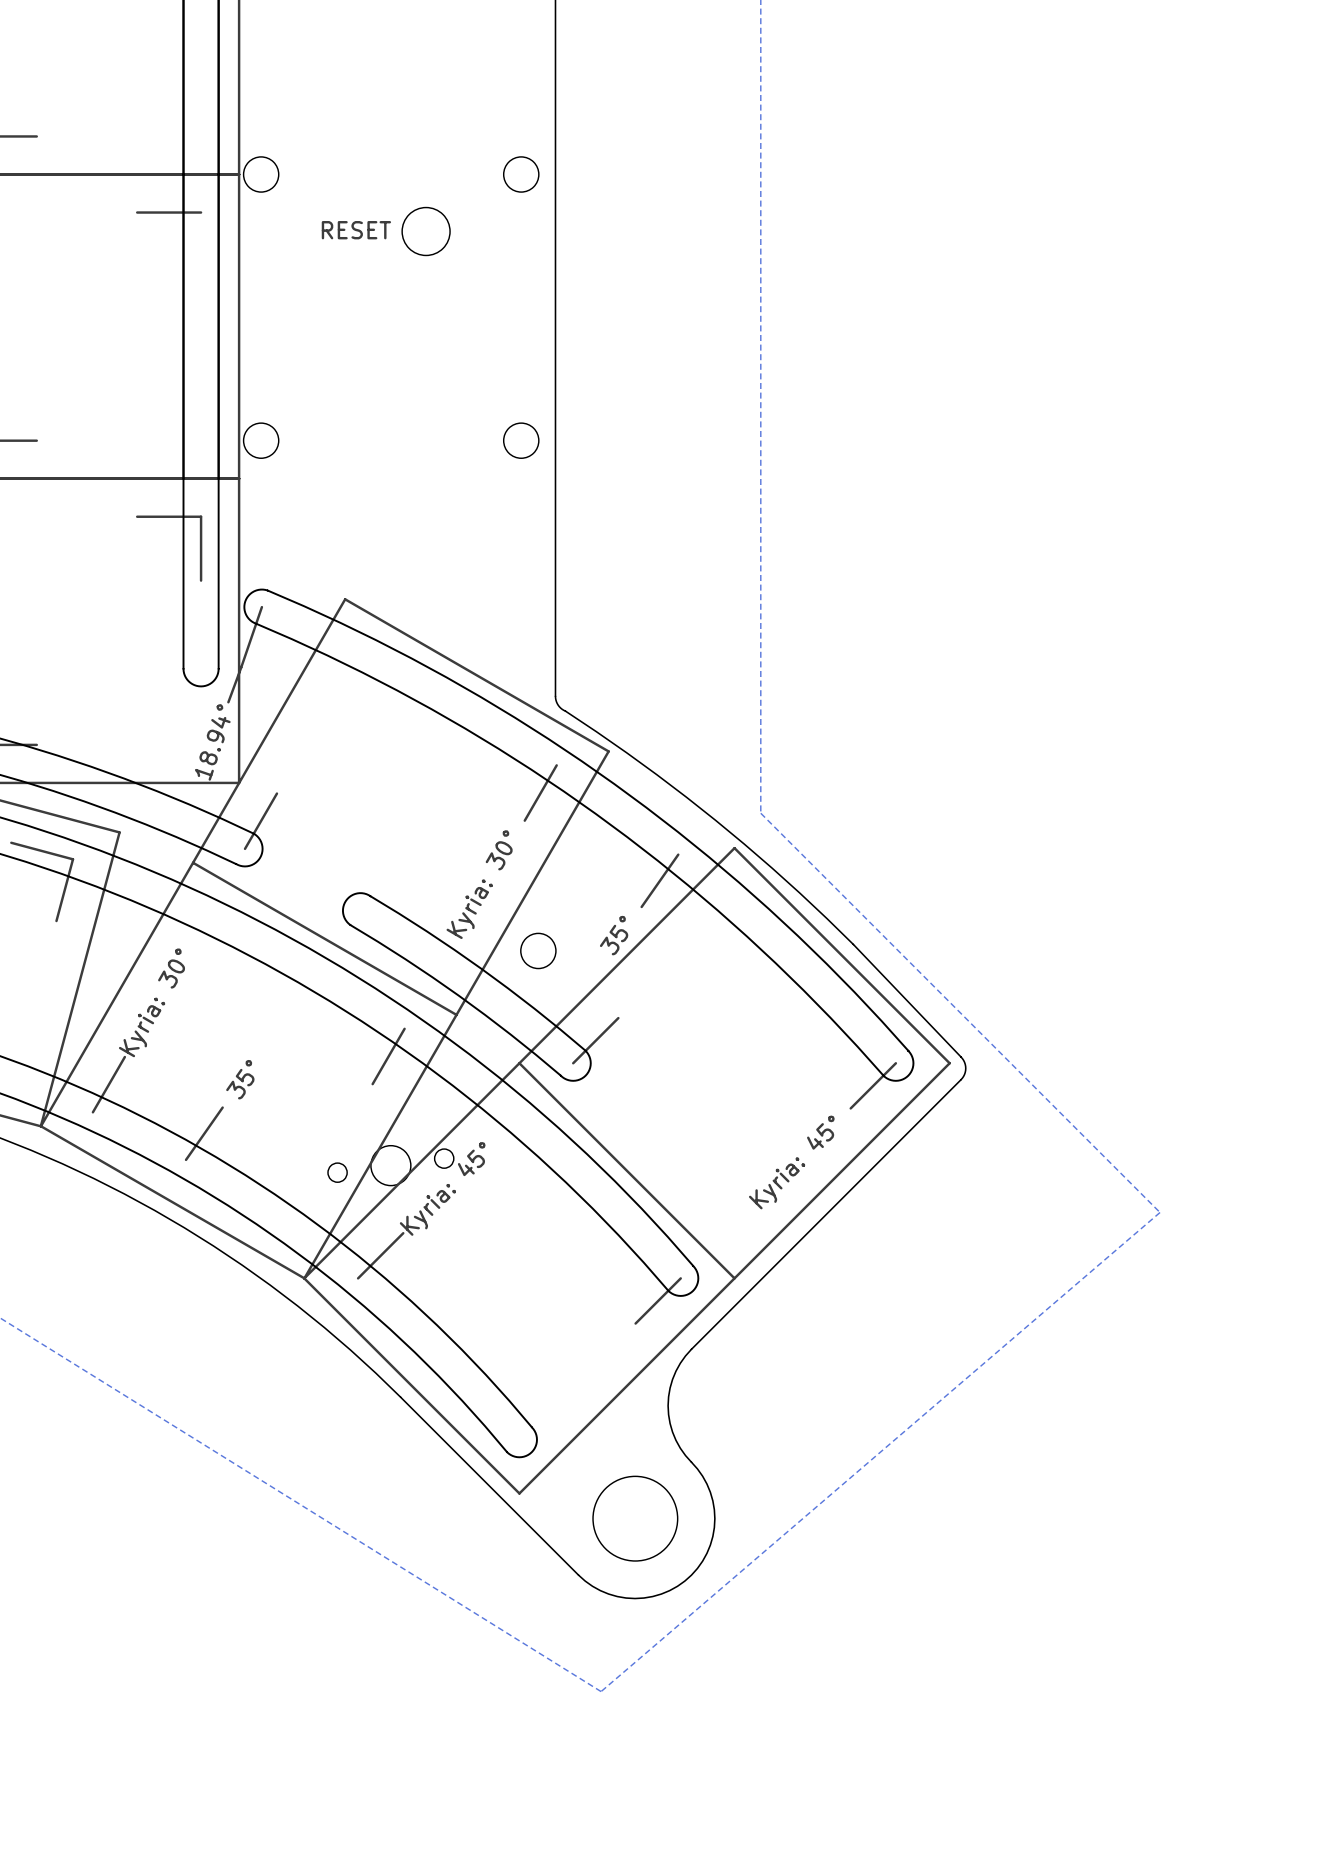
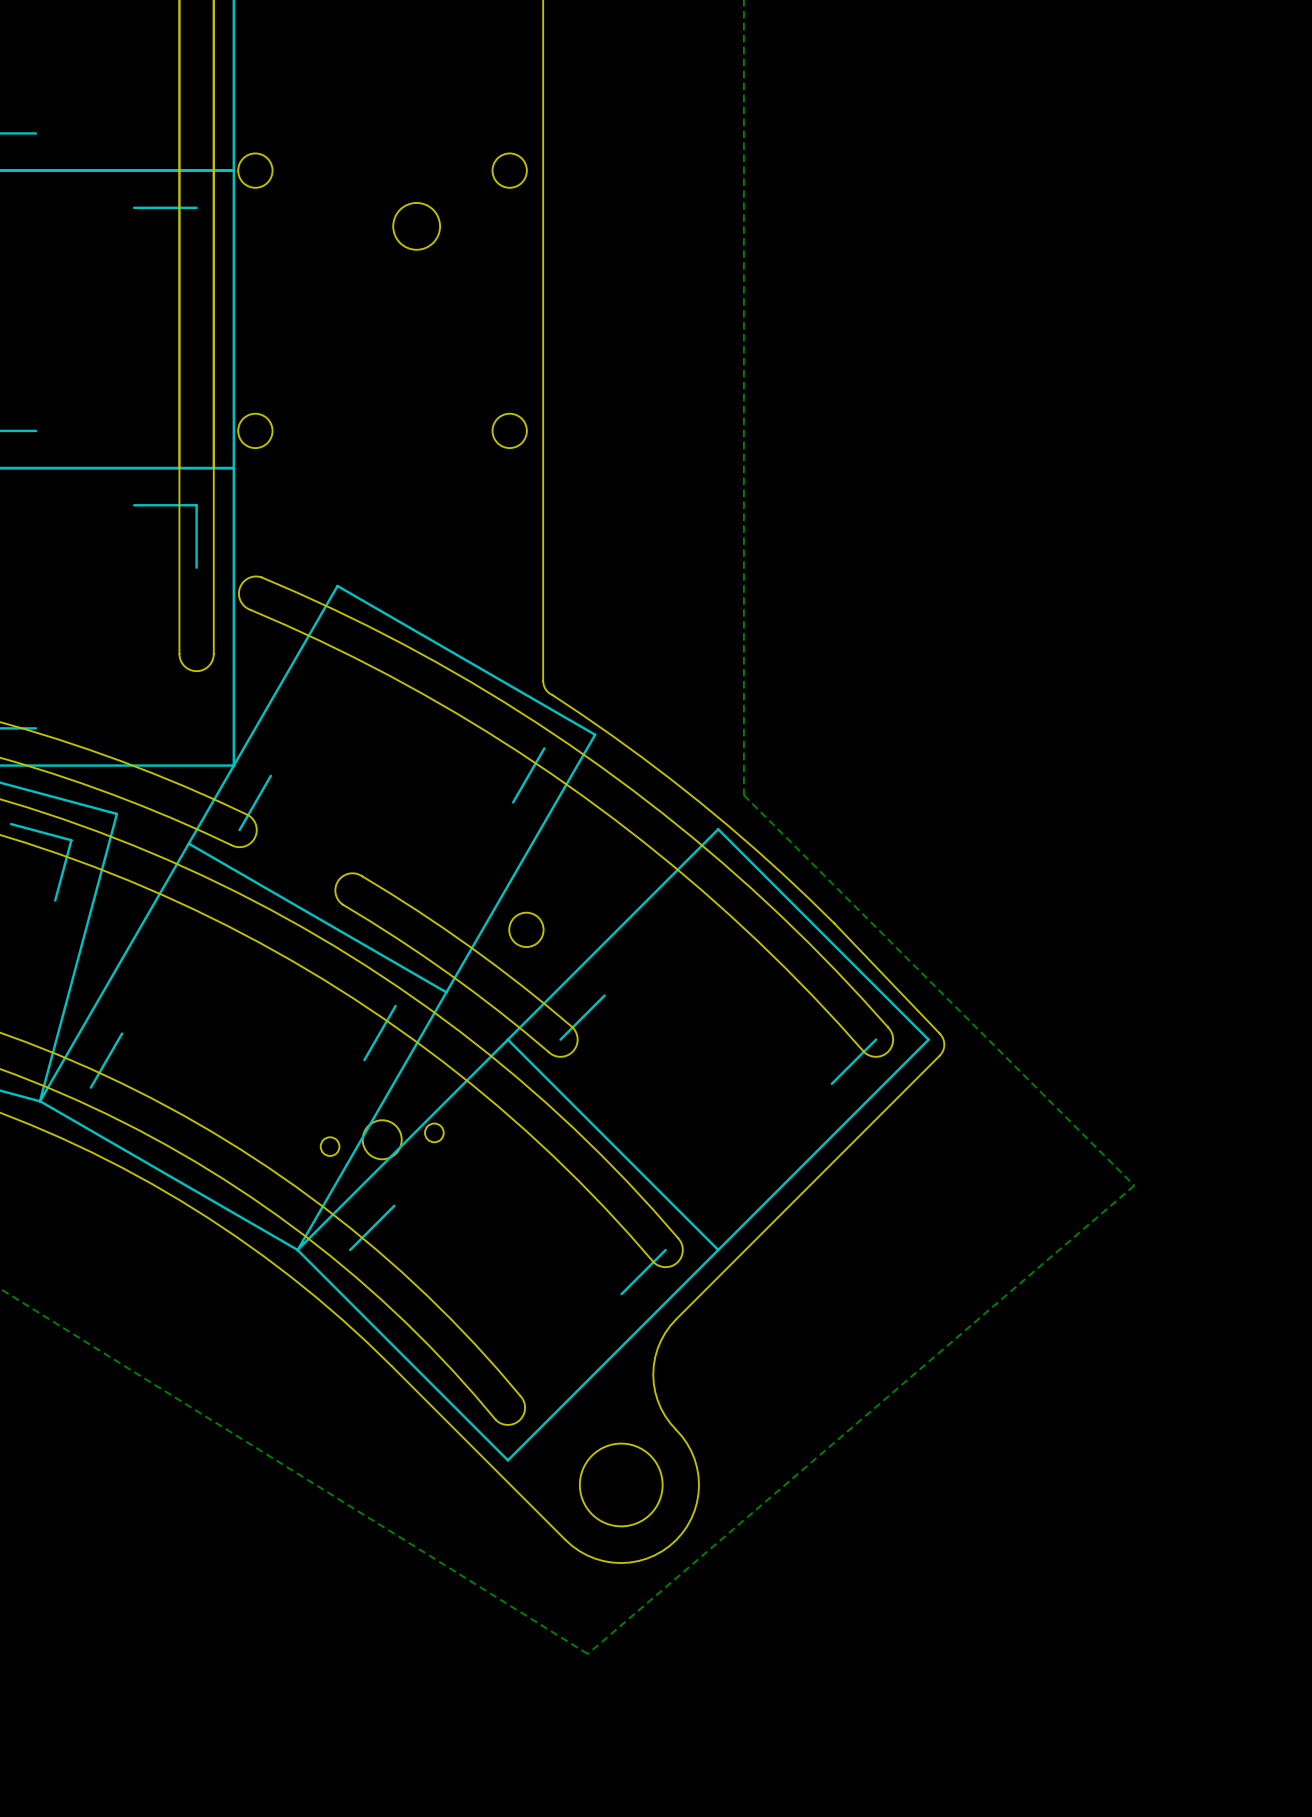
text: RESET (356, 230) -> none
line: (261, 607) (228, 702) -> none
text: 18.94° (212, 742) -> none
line: (678, 854) (641, 906) -> none
text: Kyria: 30° (479, 884) -> none
text: 35° (614, 935) -> none
text: Kyria: 30° (151, 1002) -> none
text: 35° (240, 1079) -> none
line: (222, 1107) (186, 1159) -> none
text: Kyria: 45° (791, 1162) -> none
text: Kyria: 45° (442, 1188) -> none

